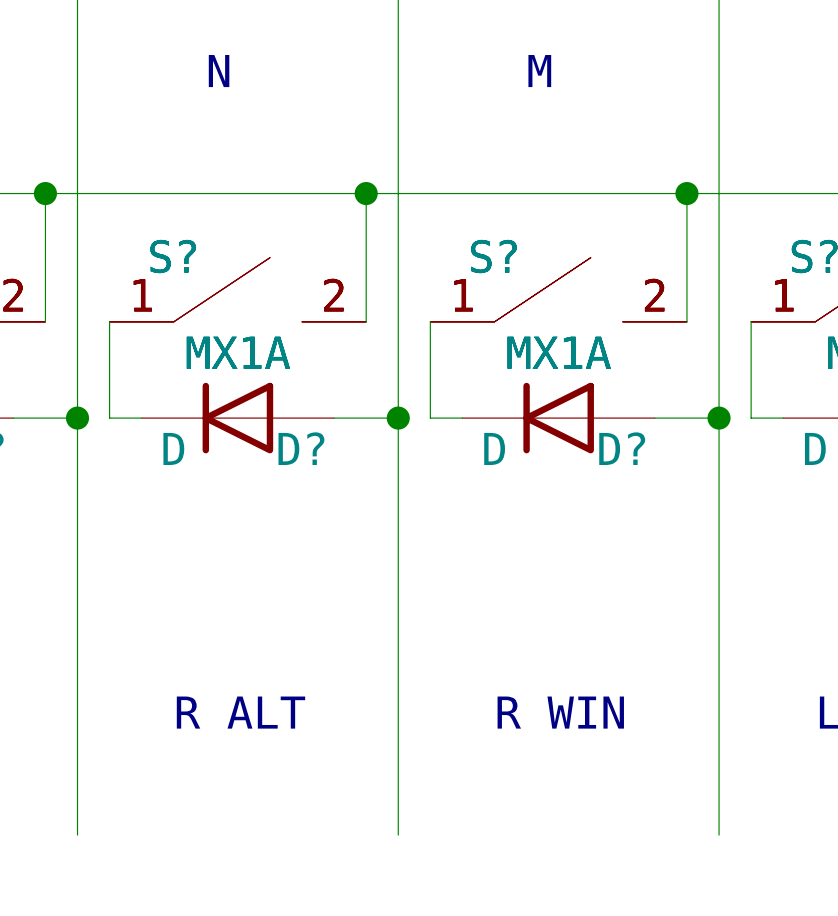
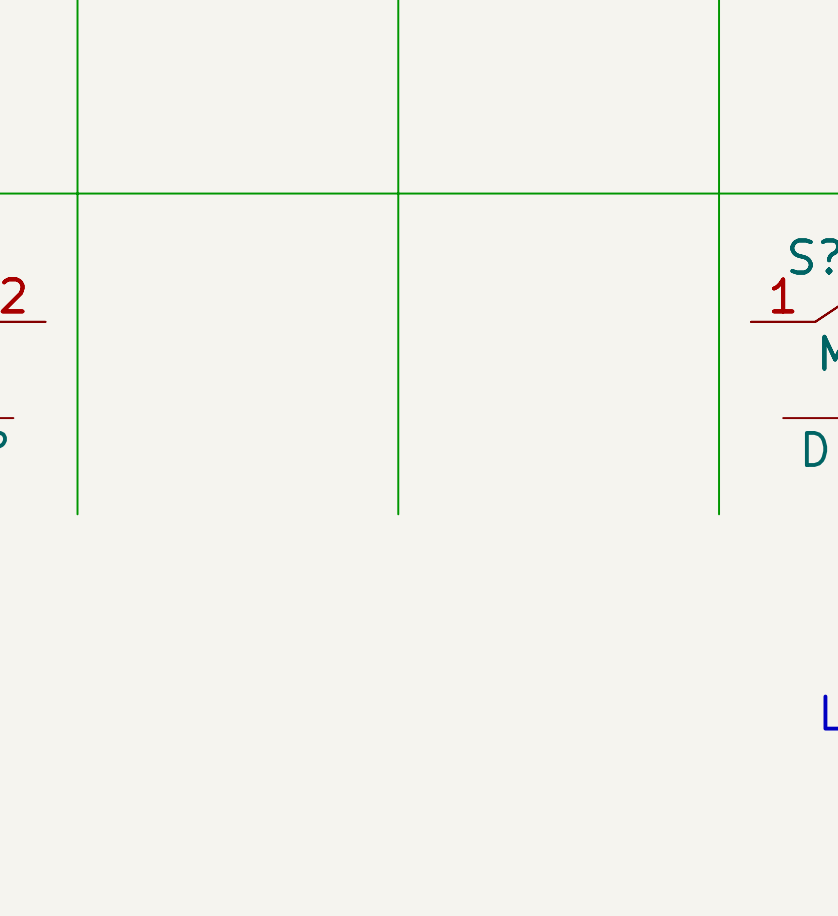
text: N (219, 71) -> none
text: M (539, 71) -> none
wire: (45, 193) (45, 321) -> none
junction: (45, 193) -> none
wire: (366, 193) (366, 321) -> none
junction: (366, 193) -> none
wire: (686, 193) (686, 321) -> none
junction: (686, 193) -> none
S?: MX1A (237, 289) -> none
S?: MX1A (558, 289) -> none
wire: (109, 321) (109, 418) (141, 418) -> none
wire: (430, 321) (430, 418) (462, 418) -> none
wire: (751, 321) (751, 418) (783, 418) -> none
wire: (13, 418) (77, 418) -> none
junction: (77, 418) -> none
D?: D (237, 418) -> none
wire: (334, 418) (398, 418) -> none
junction: (398, 418) -> none
D?: D (558, 418) -> none
wire: (654, 418) (719, 418) -> none
junction: (719, 418) -> none
wire: (77, 514) (77, 835) -> none
wire: (398, 514) (398, 835) -> none
wire: (719, 514) (719, 835) -> none
text: R ALT (240, 712) -> none
text: R WIN (560, 712) -> none

